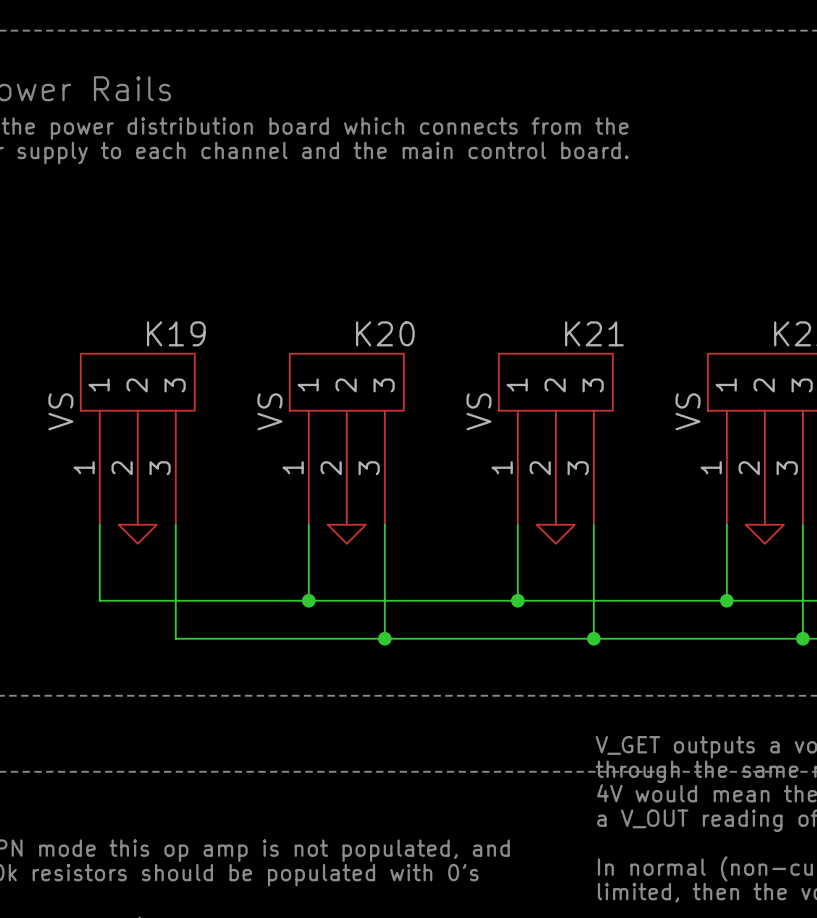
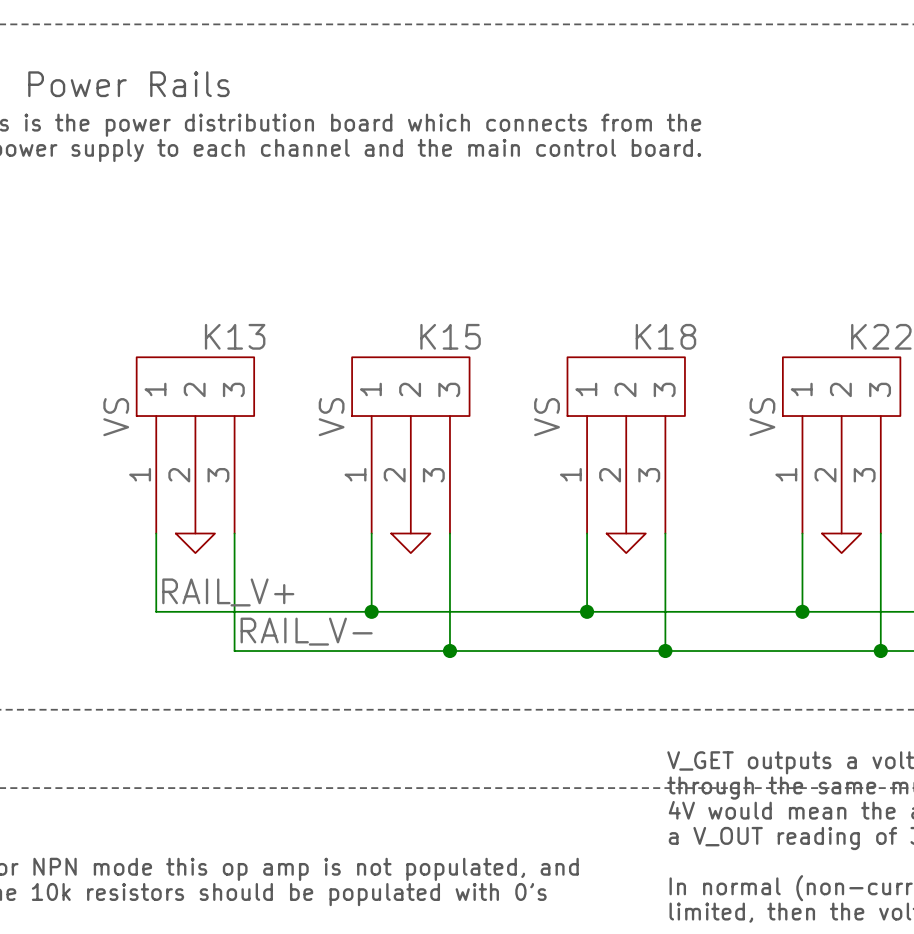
K19 name: K19 (176, 333) -> K13 (235, 336)
K20 name: K20 (385, 333) -> K15 (450, 336)
K21 name: K21 (594, 333) -> K18 (665, 336)
label: none -> RAIL_V+ (228, 592)
label: none -> RAIL_V- (306, 631)

